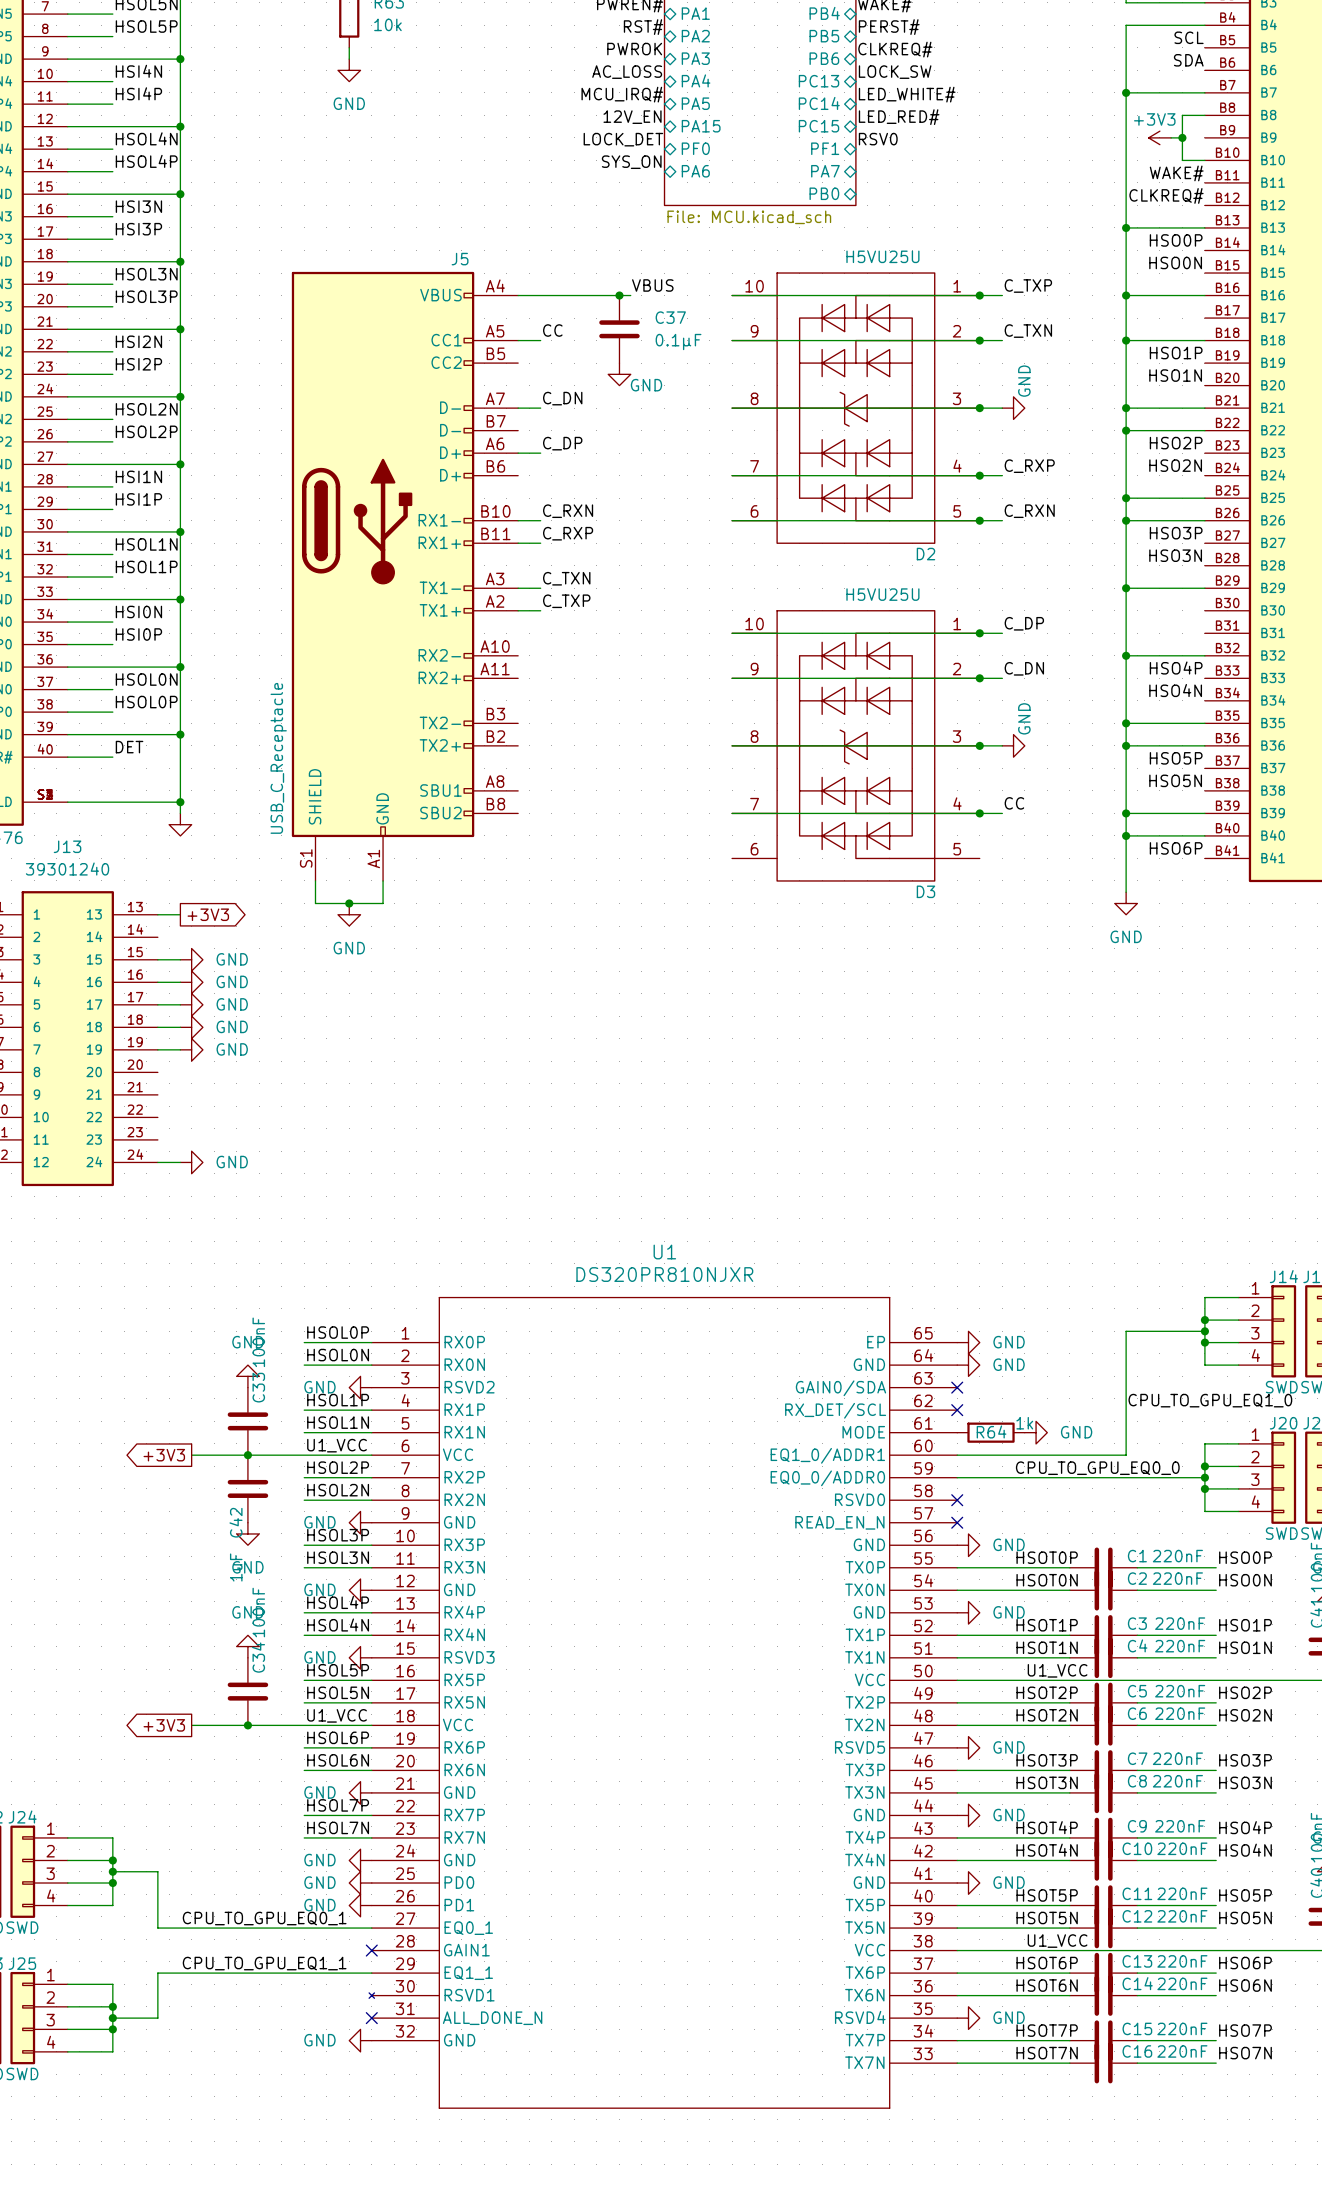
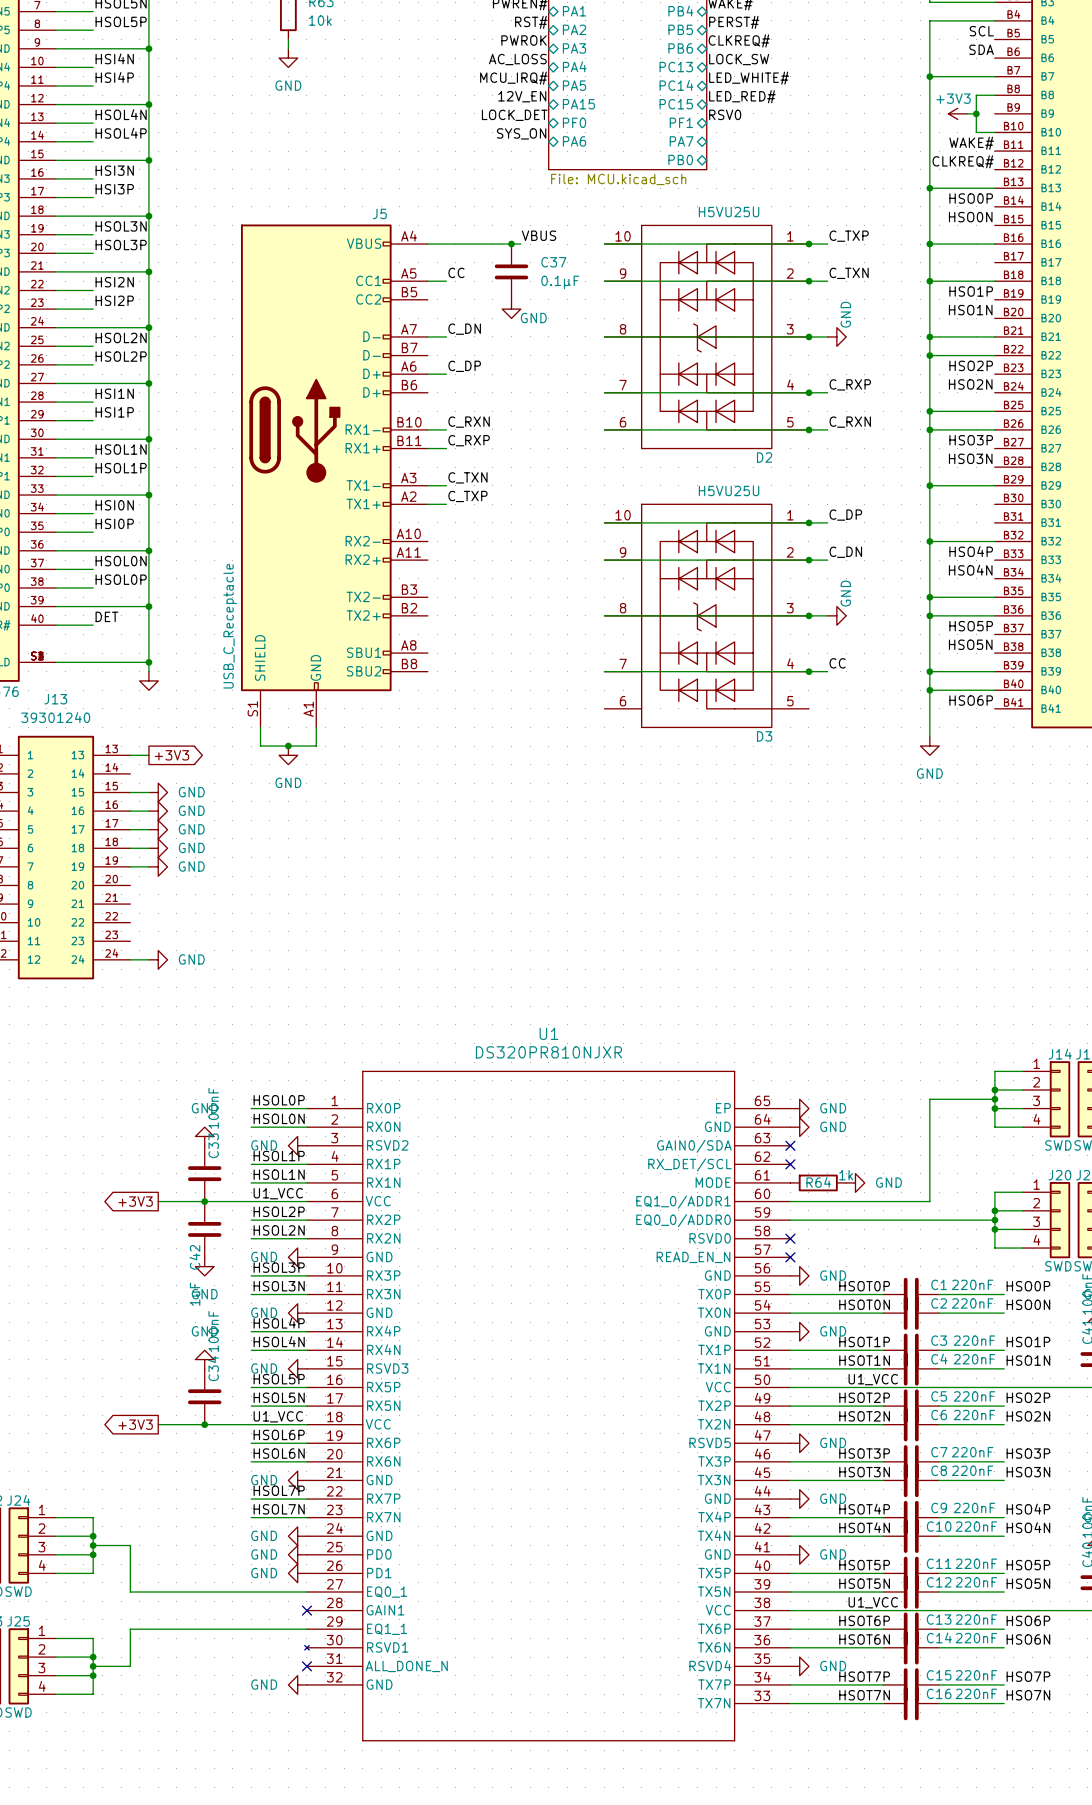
label: CPU_TO_GPU_EQ1_0 (1210, 1400) -> none
label: CPU_TO_GPU_EQ0_0 (1097, 1468) -> none
label: CPU_TO_GPU_EQ0_1 (264, 1918) -> none
label: CPU_TO_GPU_EQ1_1 (264, 1963) -> none

